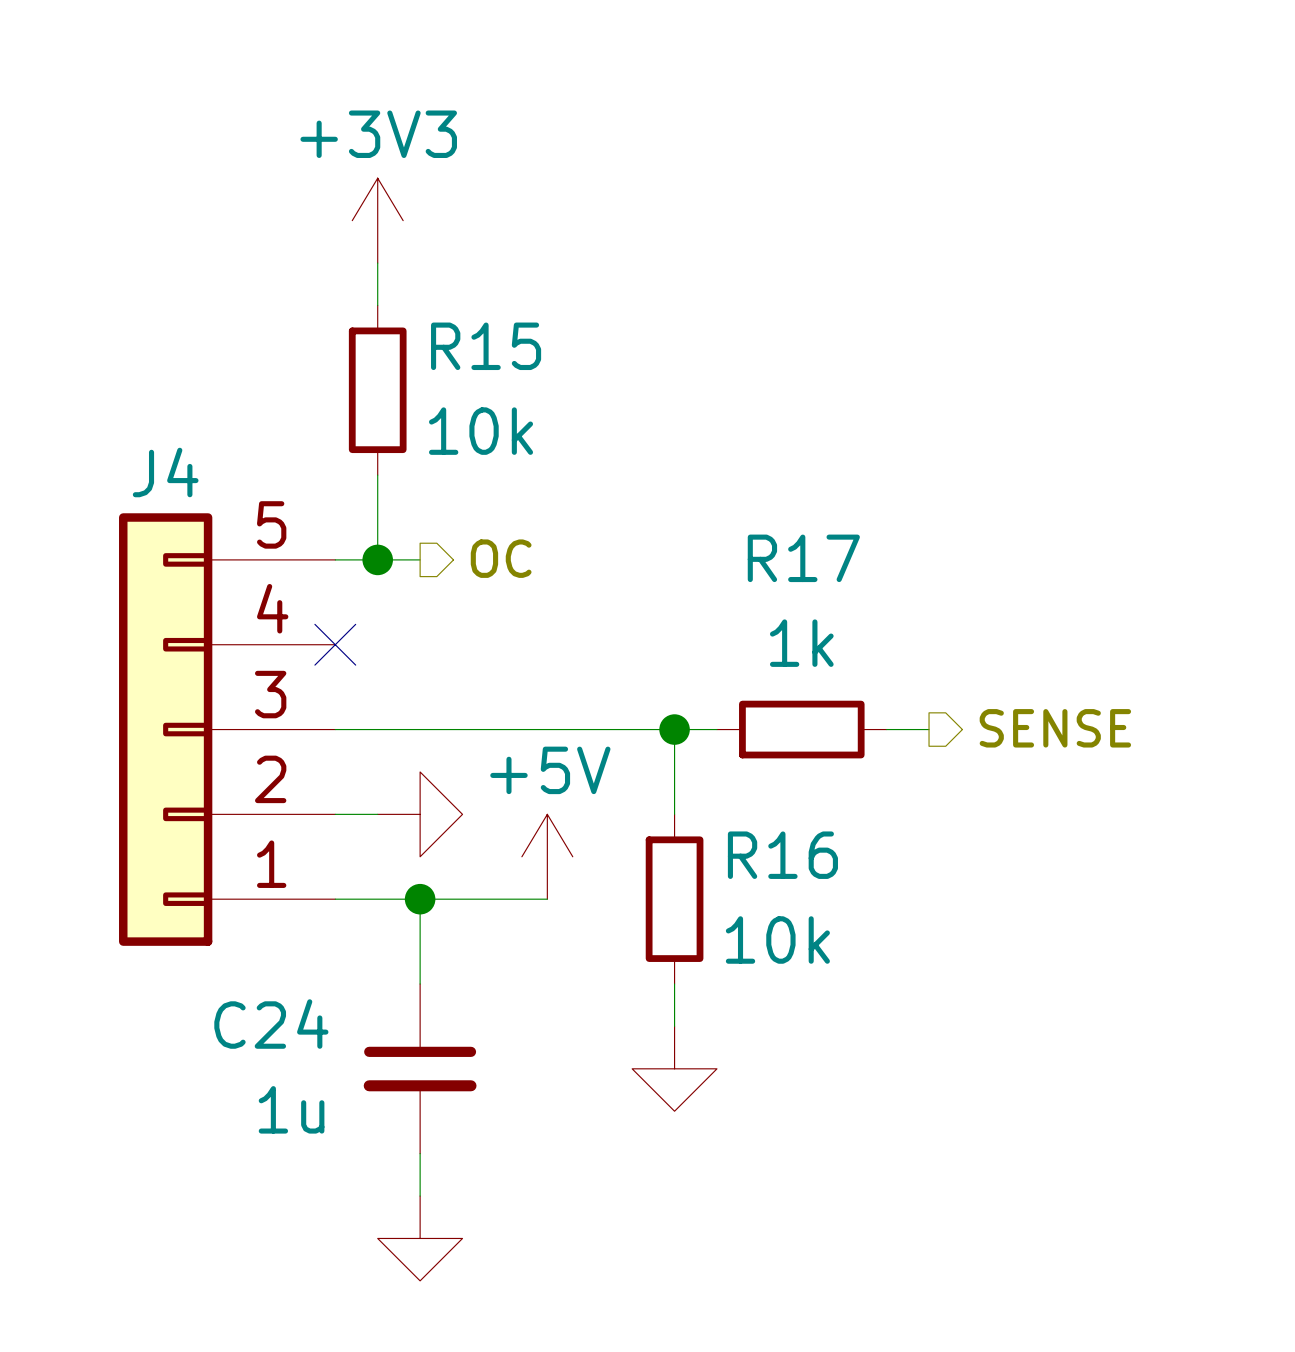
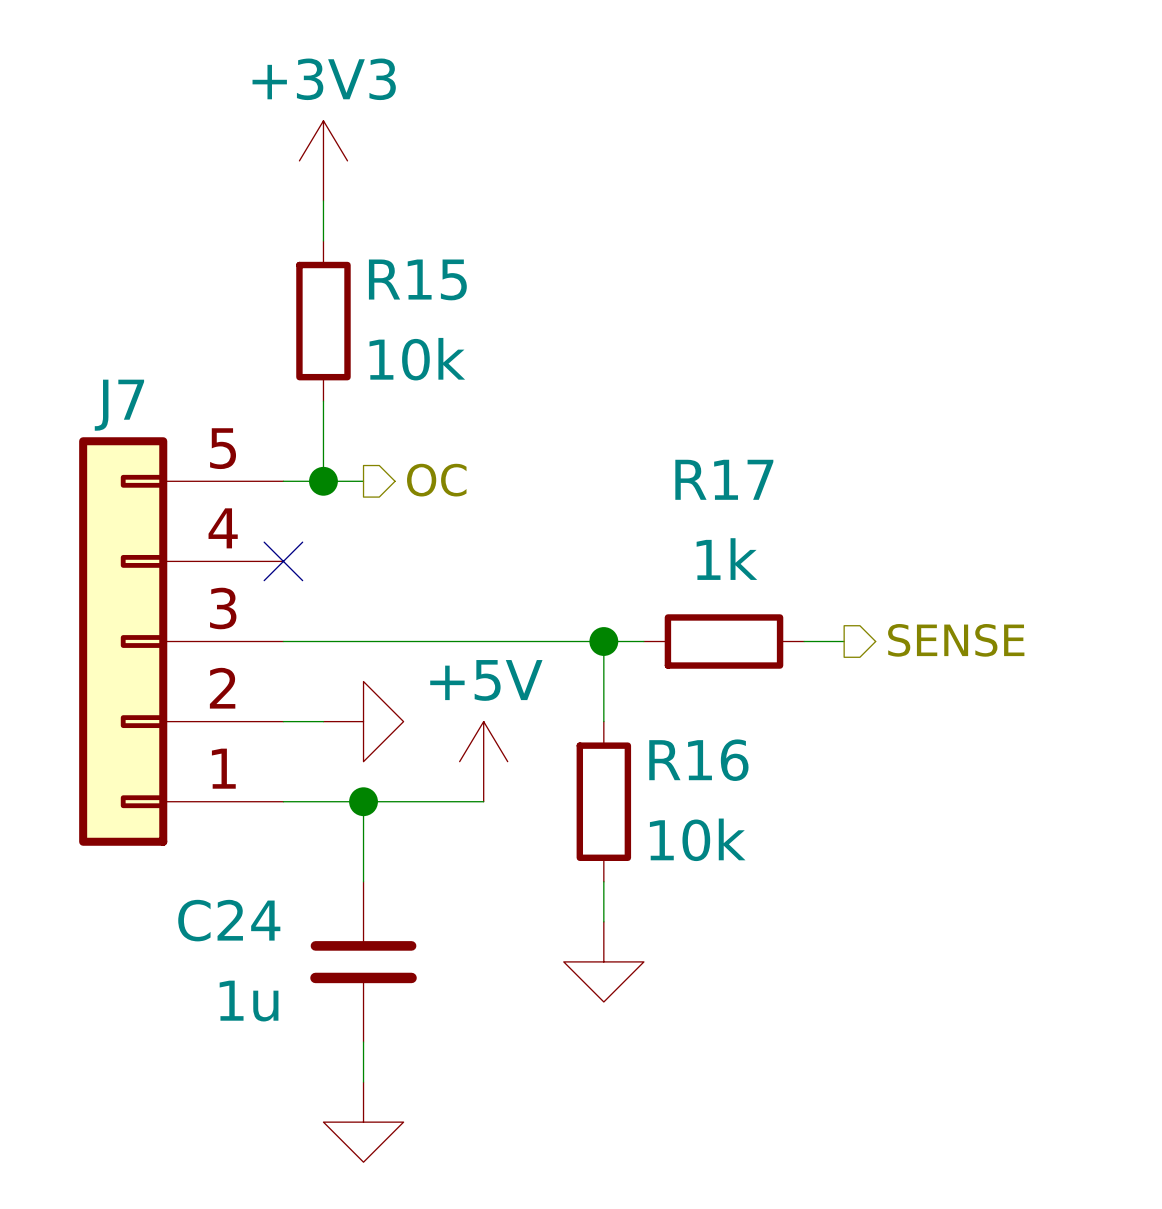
J4 name: J4 (165, 472) -> J7 (119, 405)

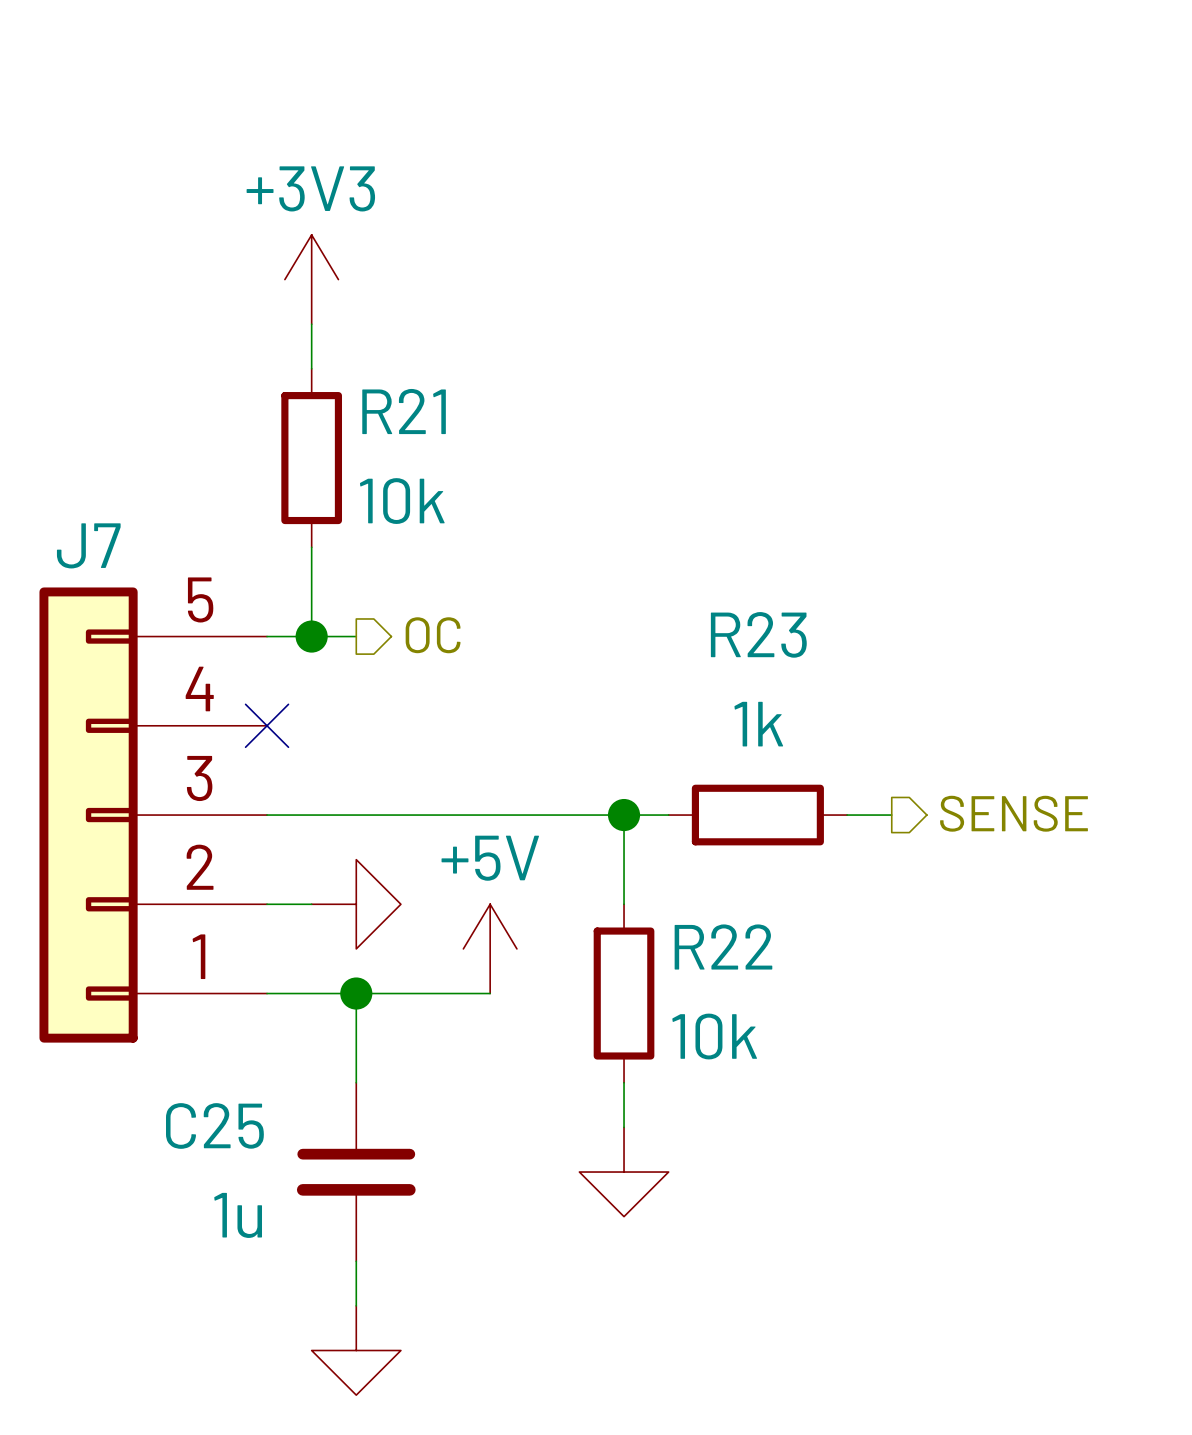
R15 name: R15 (417, 279) -> R21 (404, 411)
R17 name: R17 (724, 479) -> R23 (758, 634)
R16 name: R16 (698, 760) -> R22 (723, 946)
C24 name: C24 (229, 920) -> C25 (214, 1125)

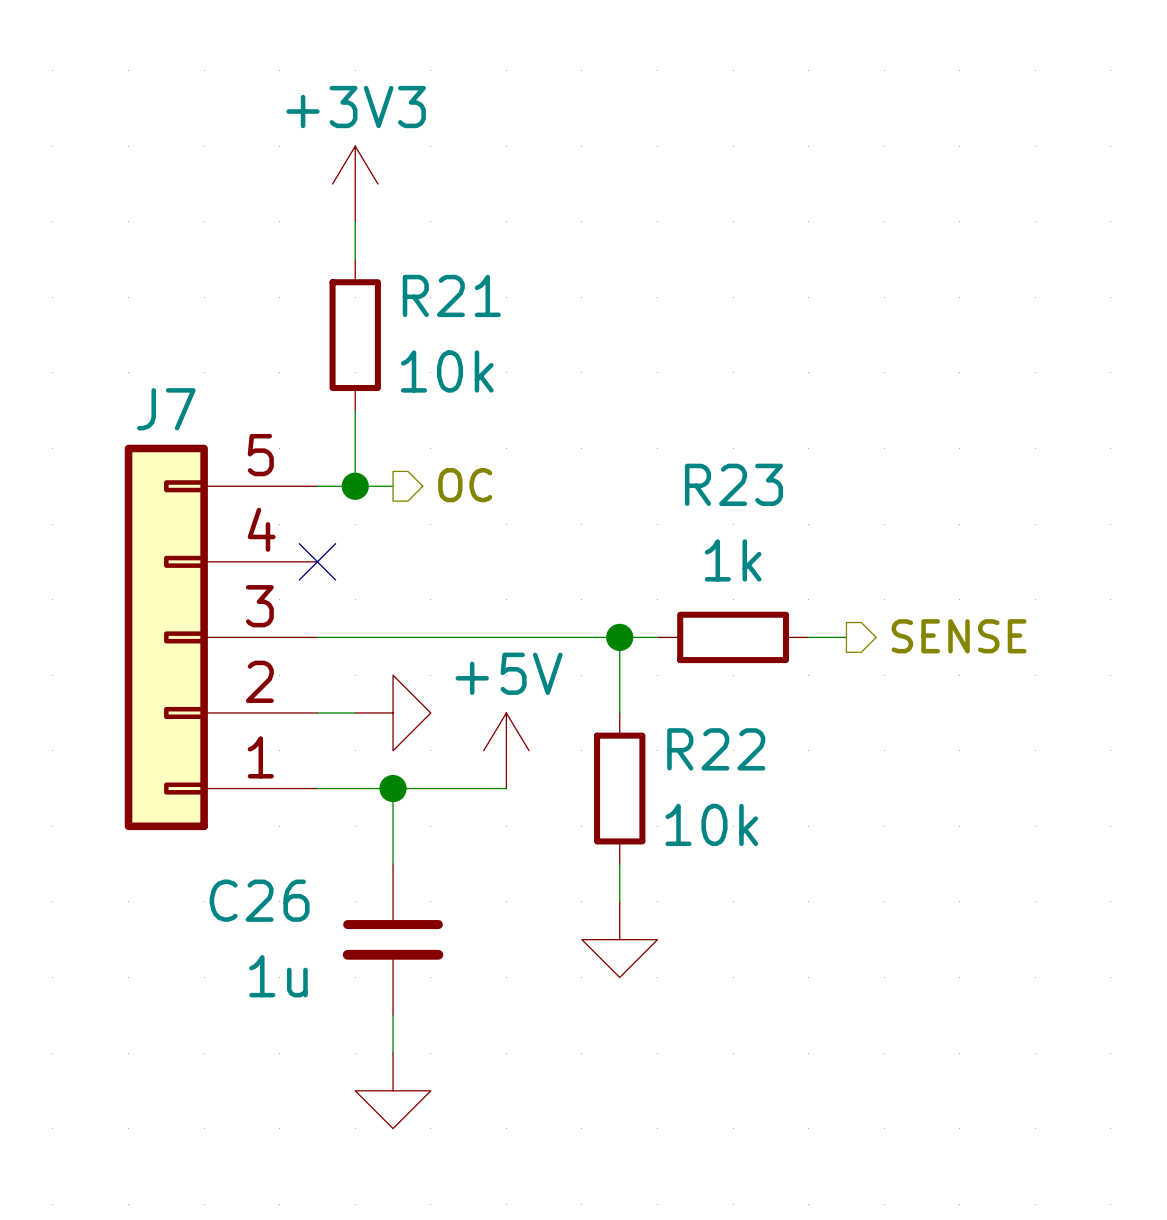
C25 name: C25 (214, 1125) -> C26 (259, 900)

